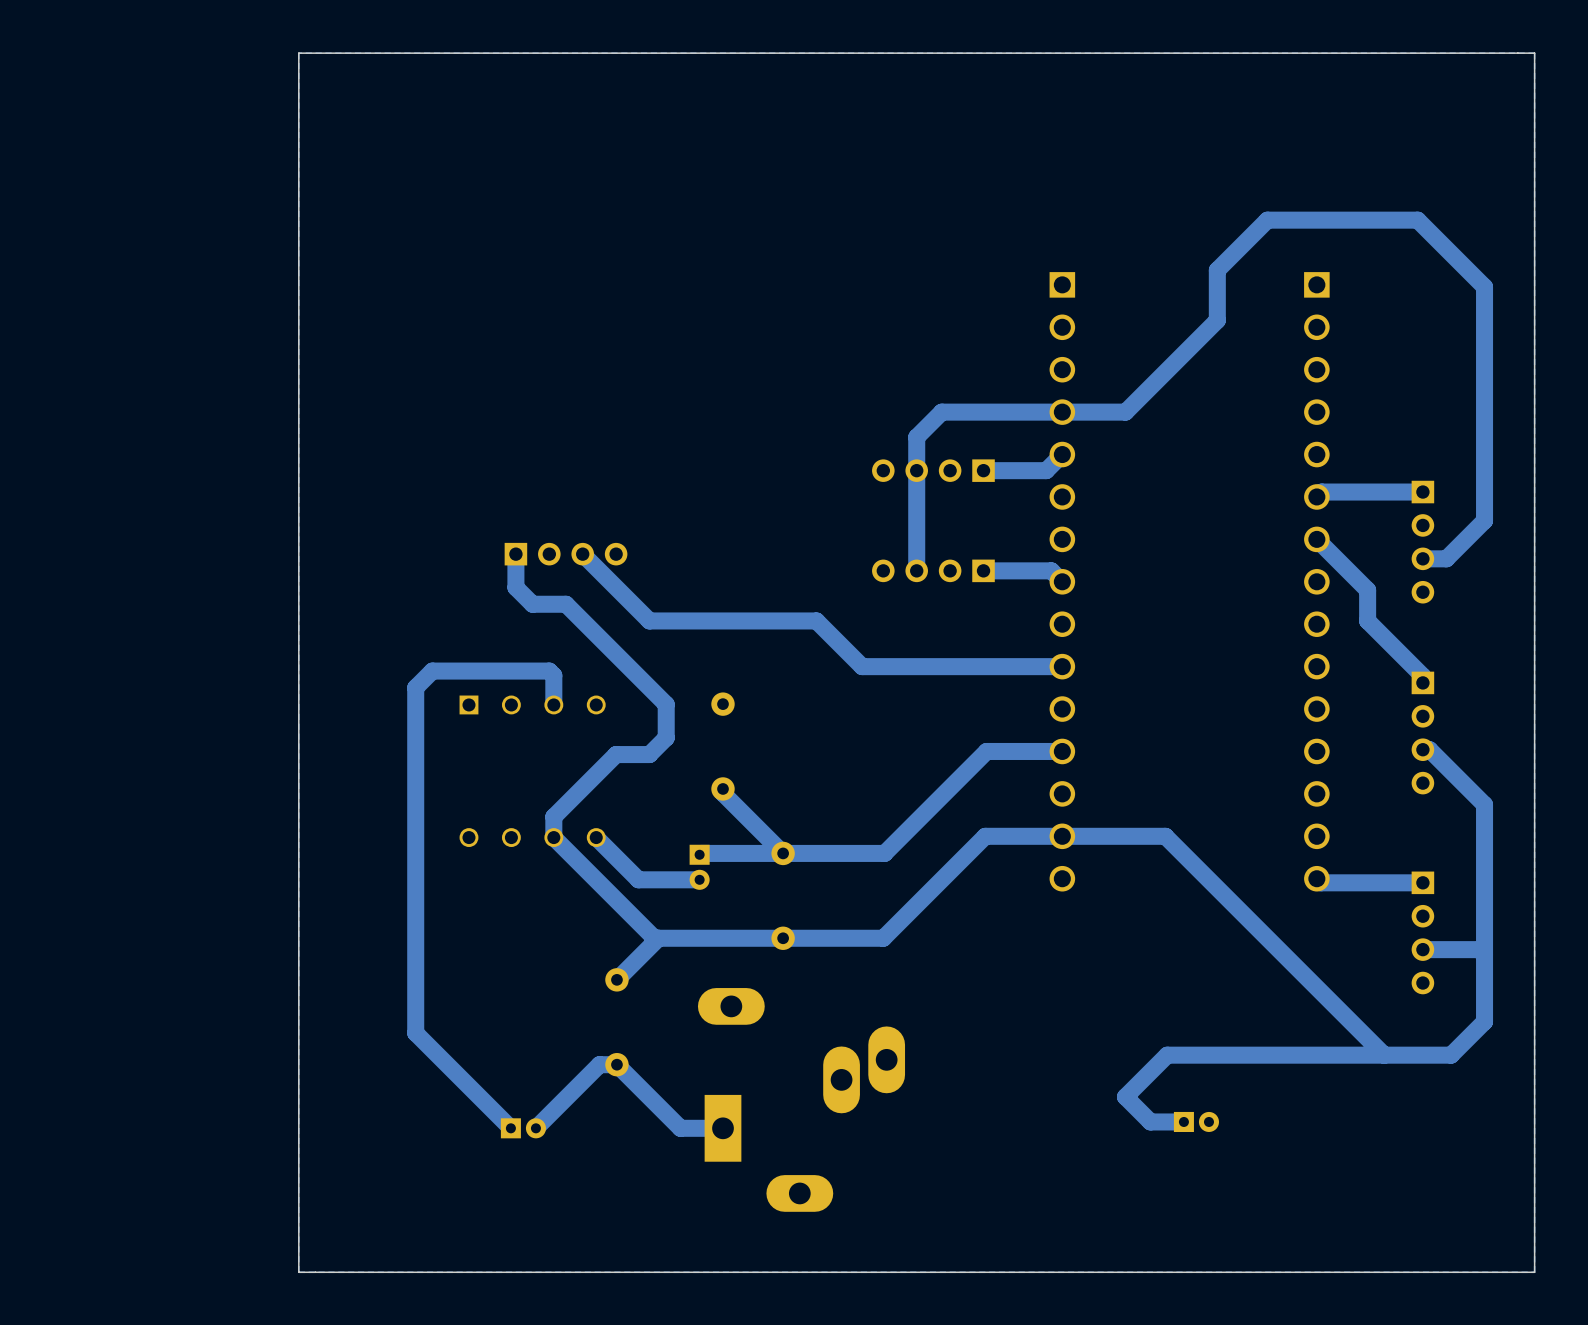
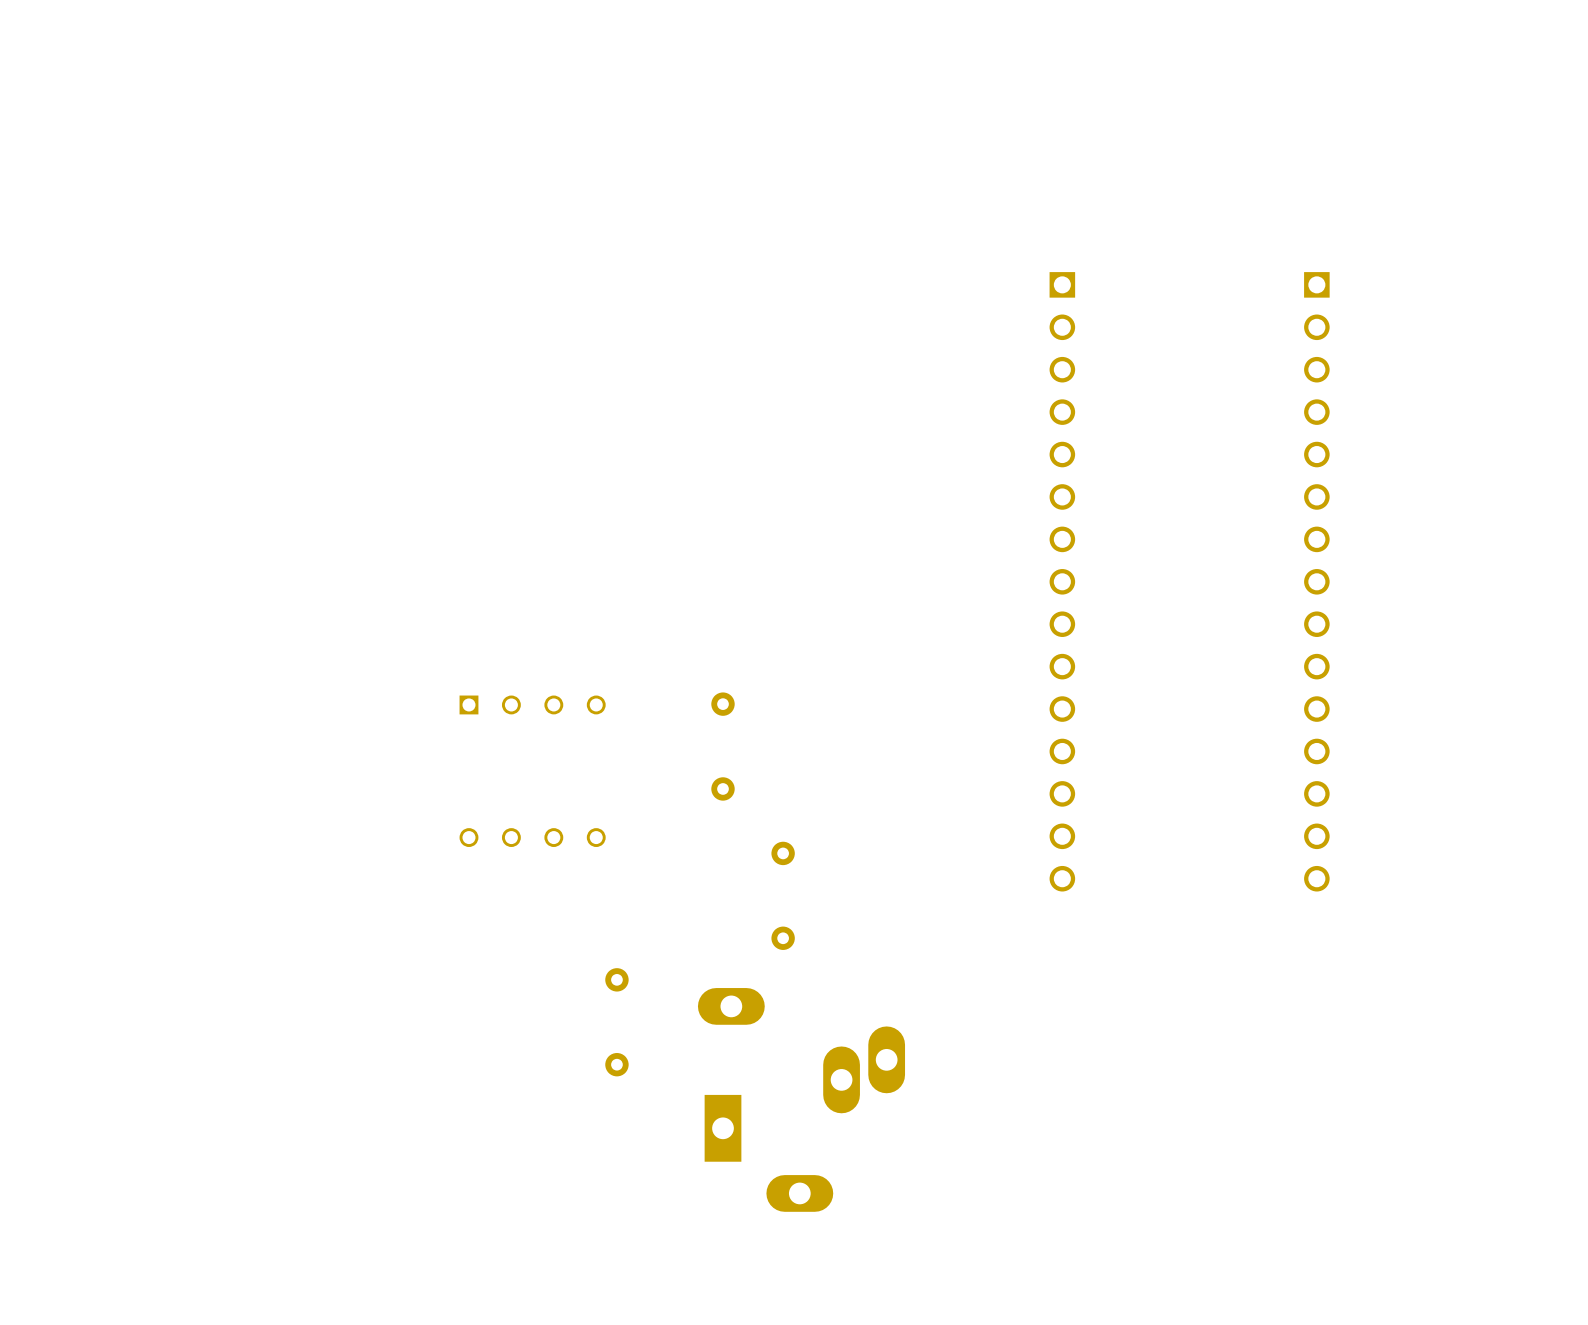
board edge: (1534, 53) (298, 53) (298, 1272) (1534, 1272) (1534, 53) -> none
track: (1062, 454) (1046, 470) (983, 470) -> none
part: (933, 470) -> none
track: (1422, 492) (1321, 492) (1316, 496) -> none
track: (1316, 539) (1367, 590) (1367, 620) (1422, 676) (1422, 682) -> none
part: (1422, 542) -> none
track: (515, 554) (515, 587) (532, 604) (566, 604) (666, 704) (666, 737) (649, 754) (616, 754) (553, 816) (553, 837) (654, 938) (883, 938) (985, 836) (1165, 836) (1384, 1055) -> none
part: (566, 554) -> none
track: (582, 554) (649, 620) (816, 620) (862, 666) (1062, 666) -> none
track: (1422, 558) (1446, 558) (1484, 520) (1484, 286) (1417, 220) (1267, 220) (1217, 270) (1217, 320) (1125, 412) (941, 412) (916, 437) (916, 570) -> none
part: (933, 570) -> none
track: (983, 570) (1051, 570) (1062, 581) -> none
track: (553, 704) (553, 675) (549, 671) (432, 671) (415, 687) (415, 1033) (510, 1128) -> none
part: (1422, 733) -> none
track: (1422, 749) (1429, 749) (1484, 804) (1484, 1021) (1451, 1055) (1167, 1055) (1125, 1096) (1150, 1121) (1183, 1121) -> none
track: (1062, 751) (986, 751) (884, 853) (699, 854) -> none
track: (723, 788) (723, 793) (783, 853) -> none
track: (596, 837) (638, 879) (699, 879) -> none
part: (699, 867) -> none
track: (1316, 878) (1320, 882) (1422, 882) -> none
part: (1422, 932) -> none
track: (658, 938) (616, 979) -> none
track: (1422, 949) (1479, 949) (1484, 954) -> none
part: (1196, 1121) -> none
part: (523, 1128) -> none
track: (723, 1128) (680, 1128) (616, 1064) (599, 1064) (535, 1128) -> none

